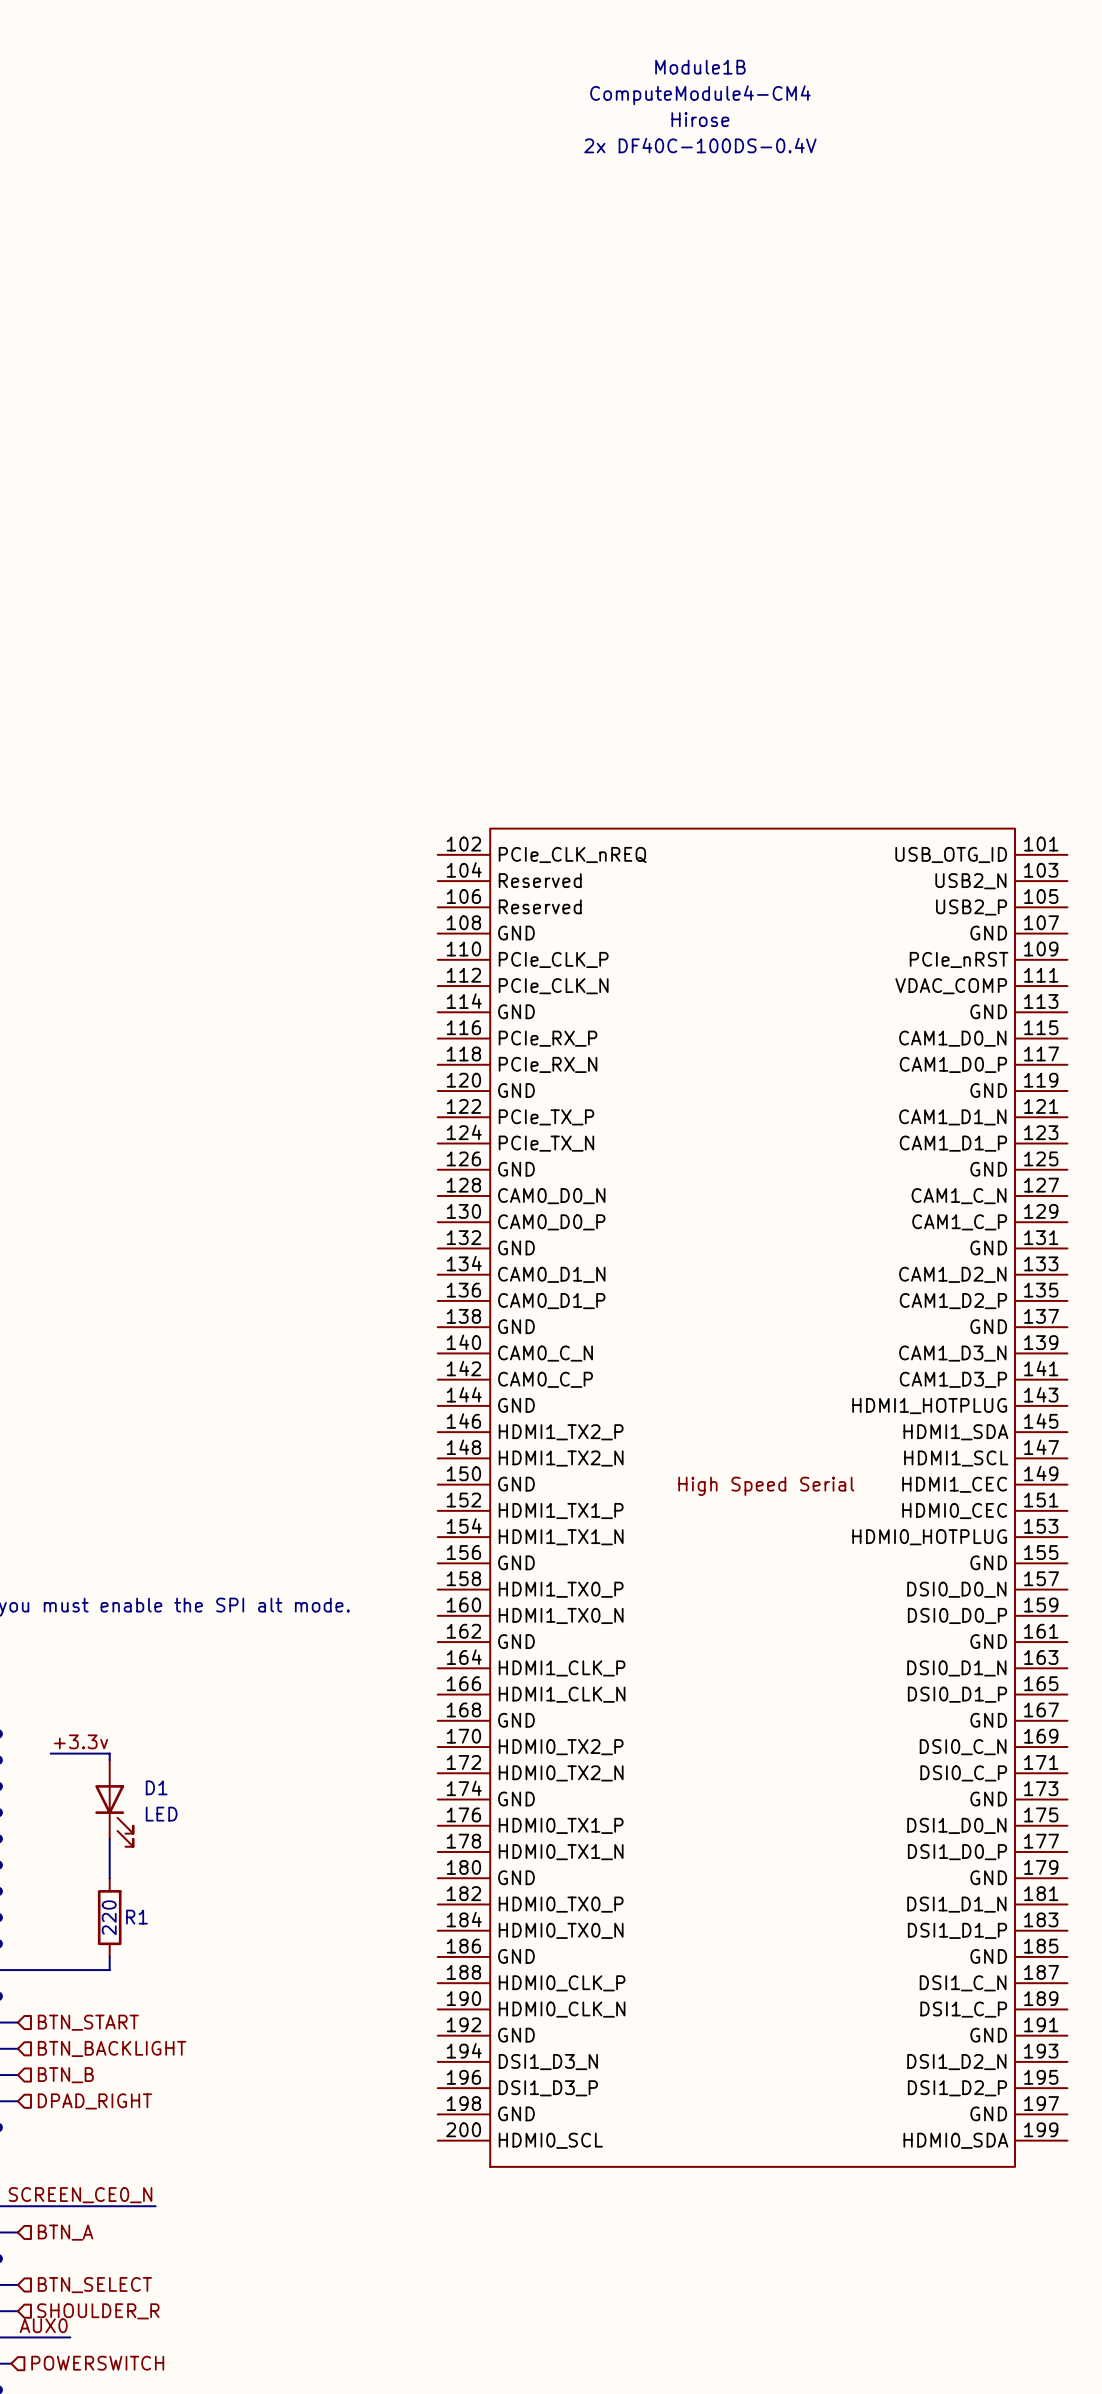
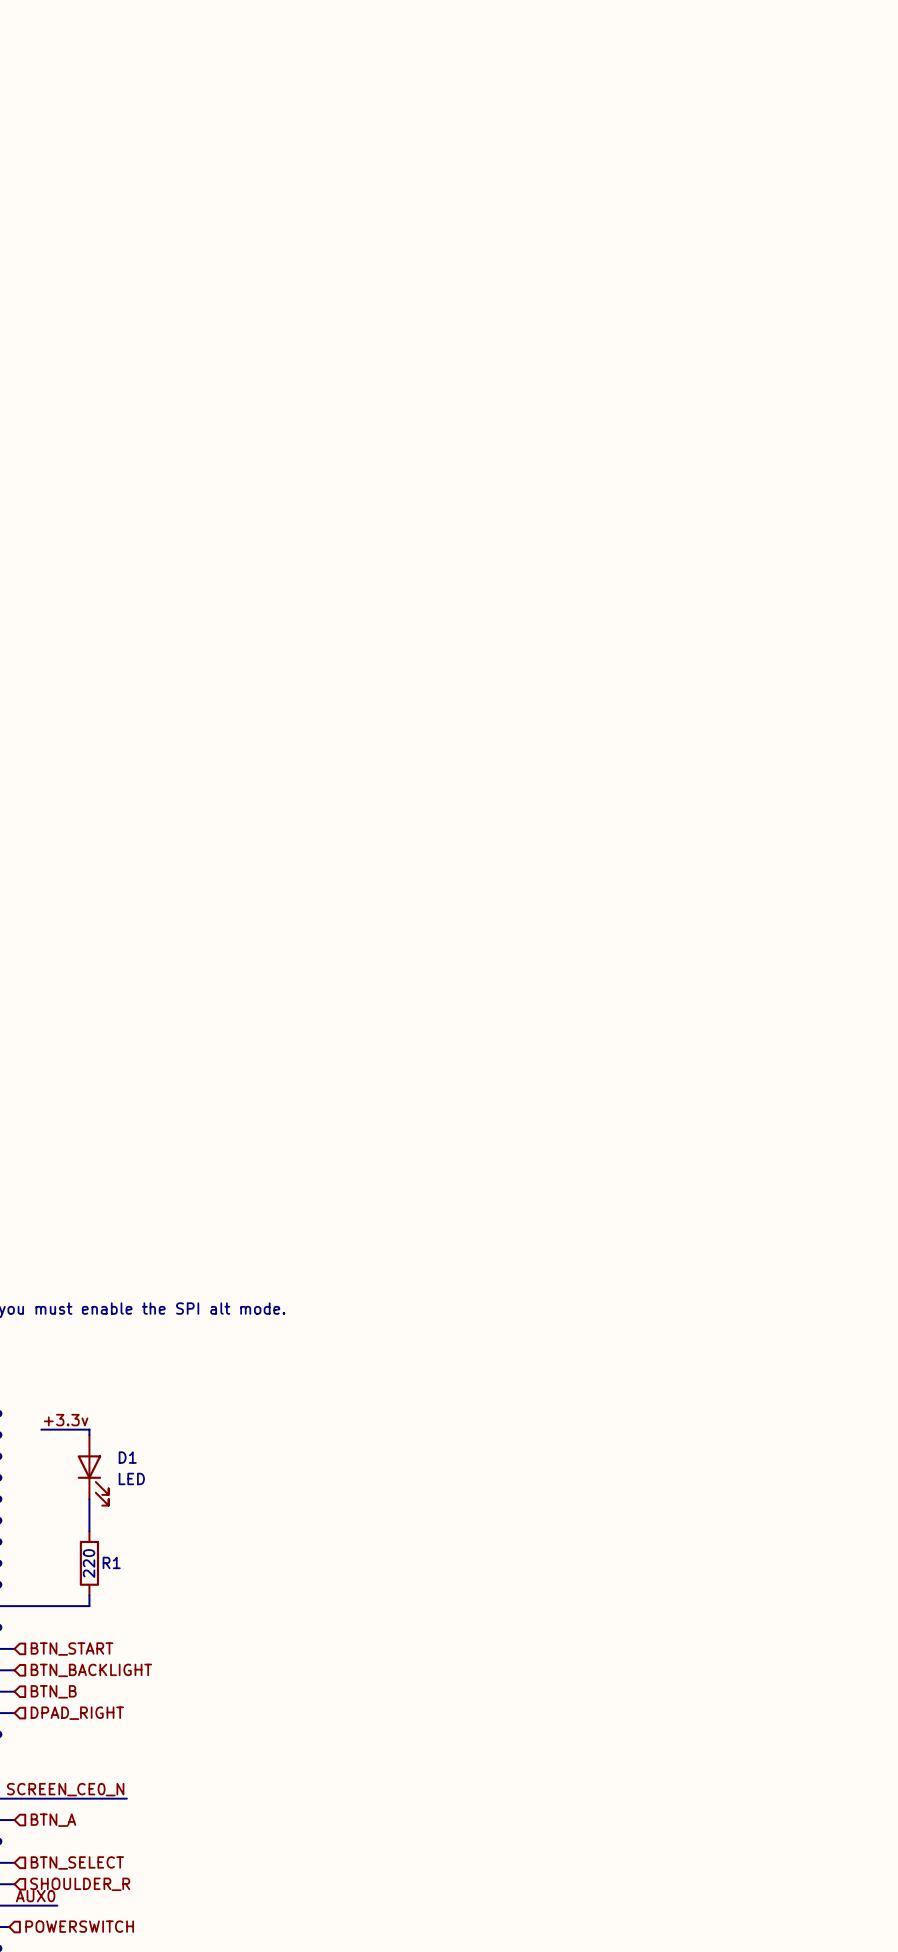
Module1B: ComputeModule4-CM4 (752, 1497) -> none

